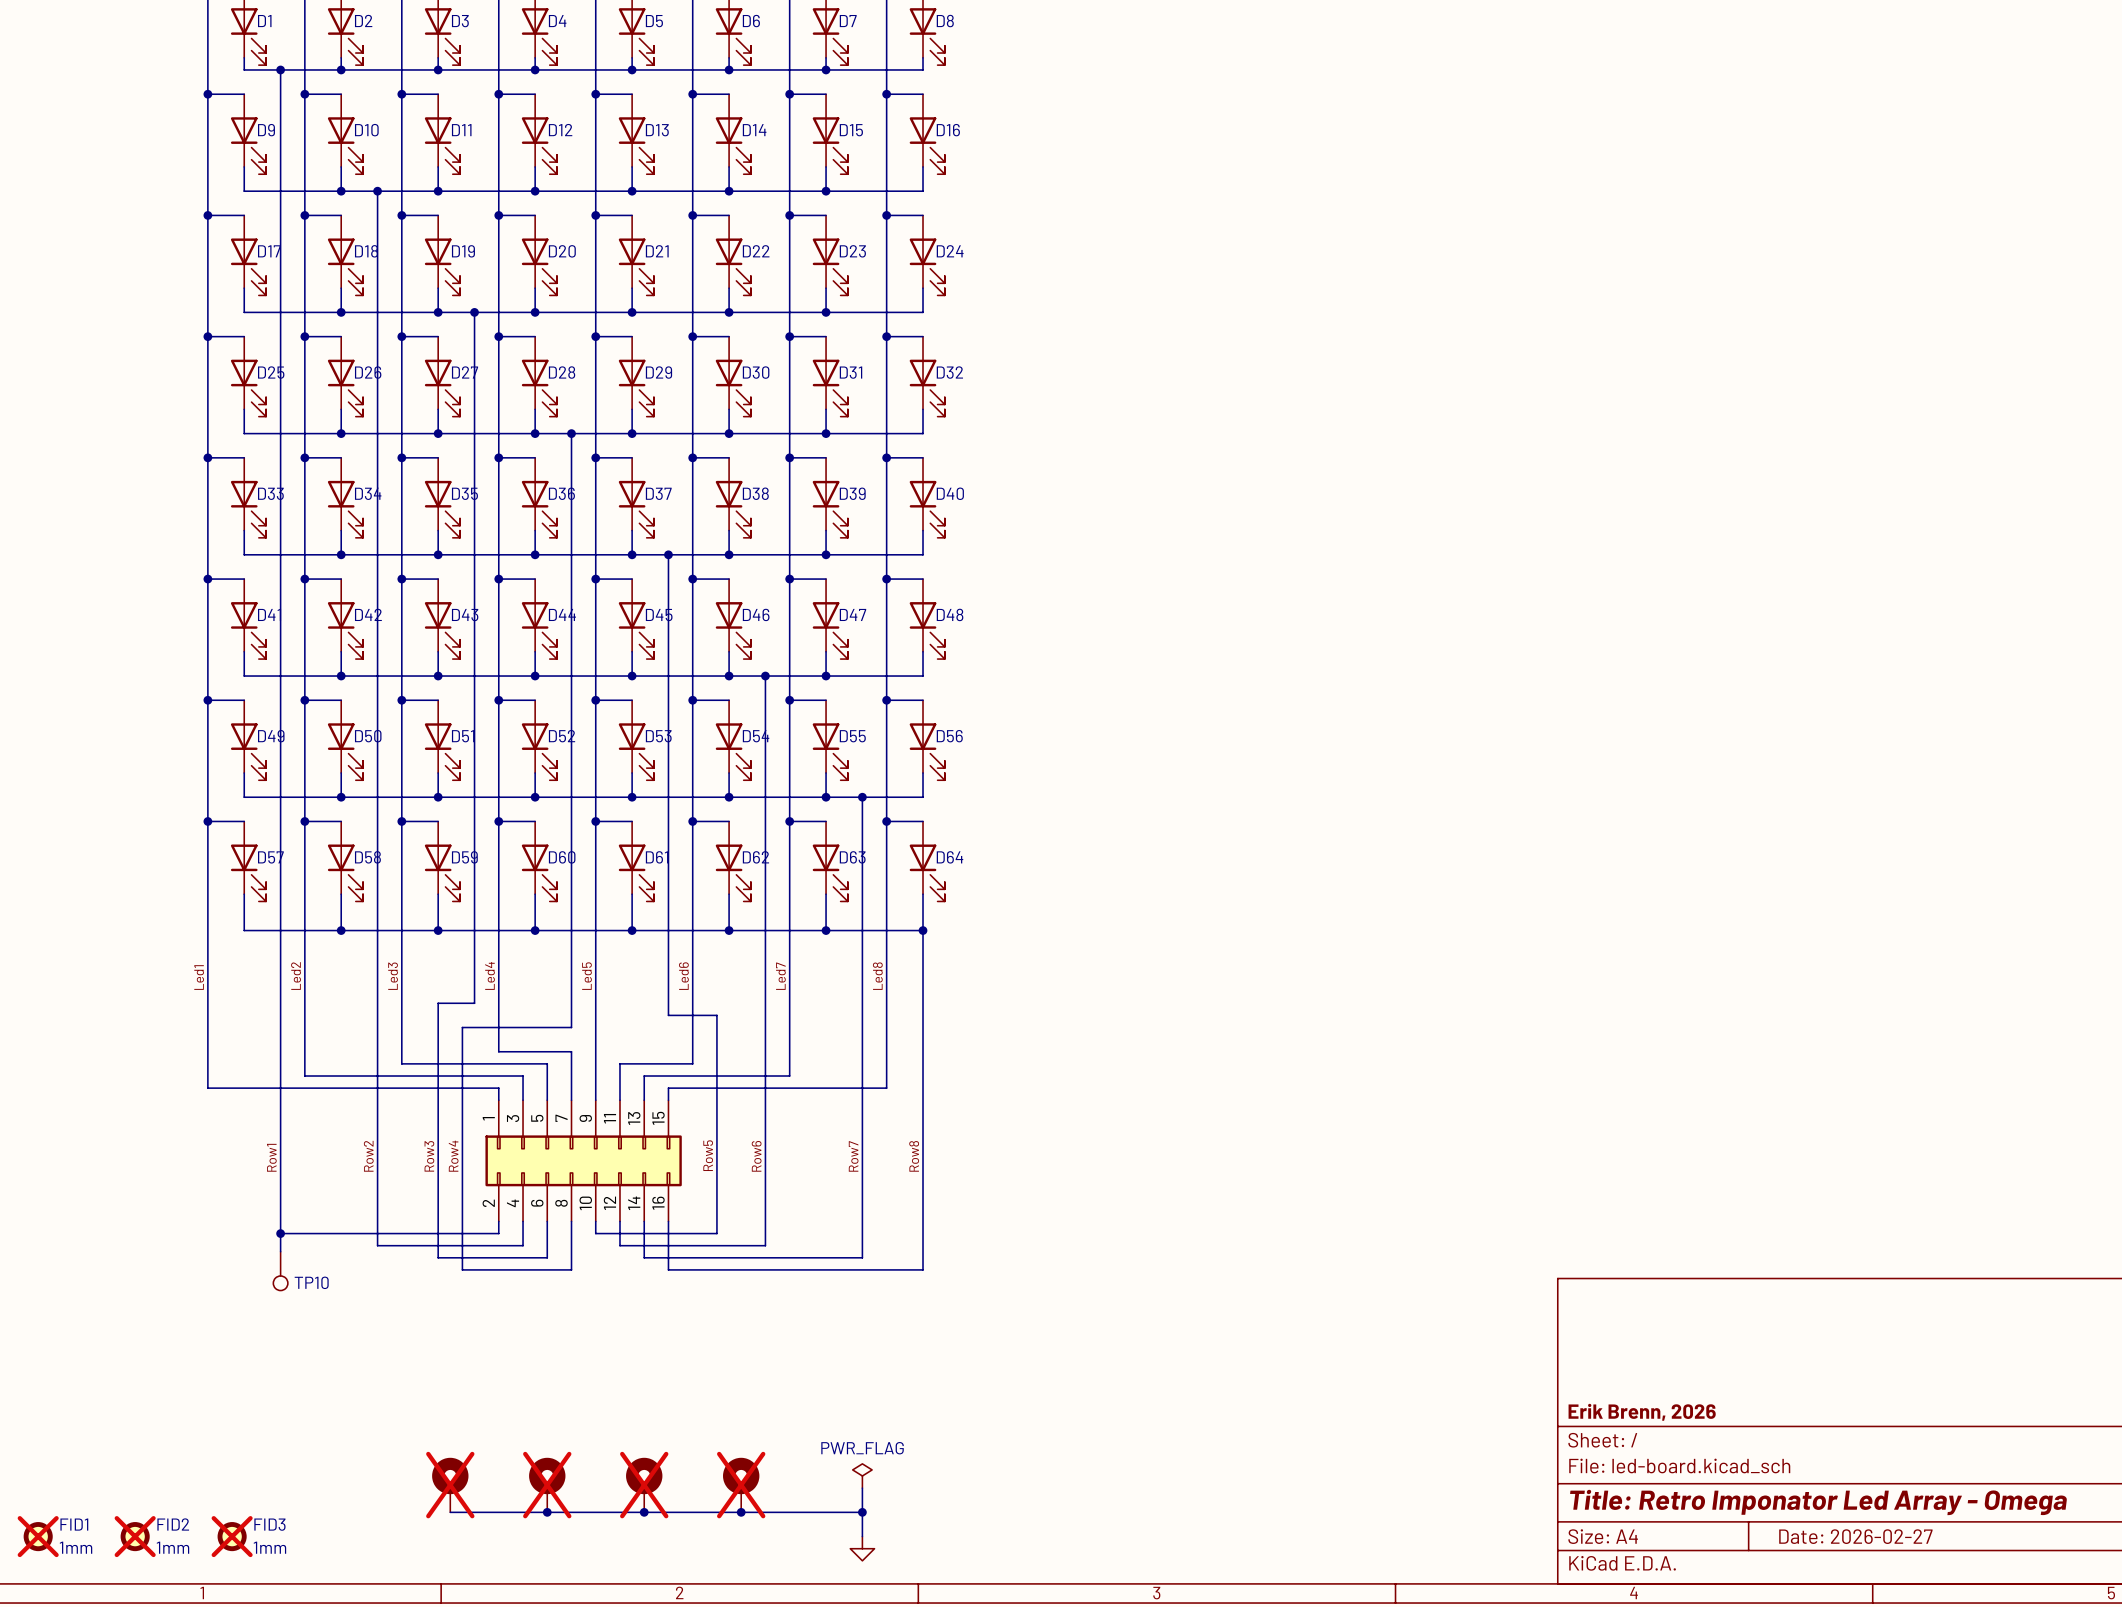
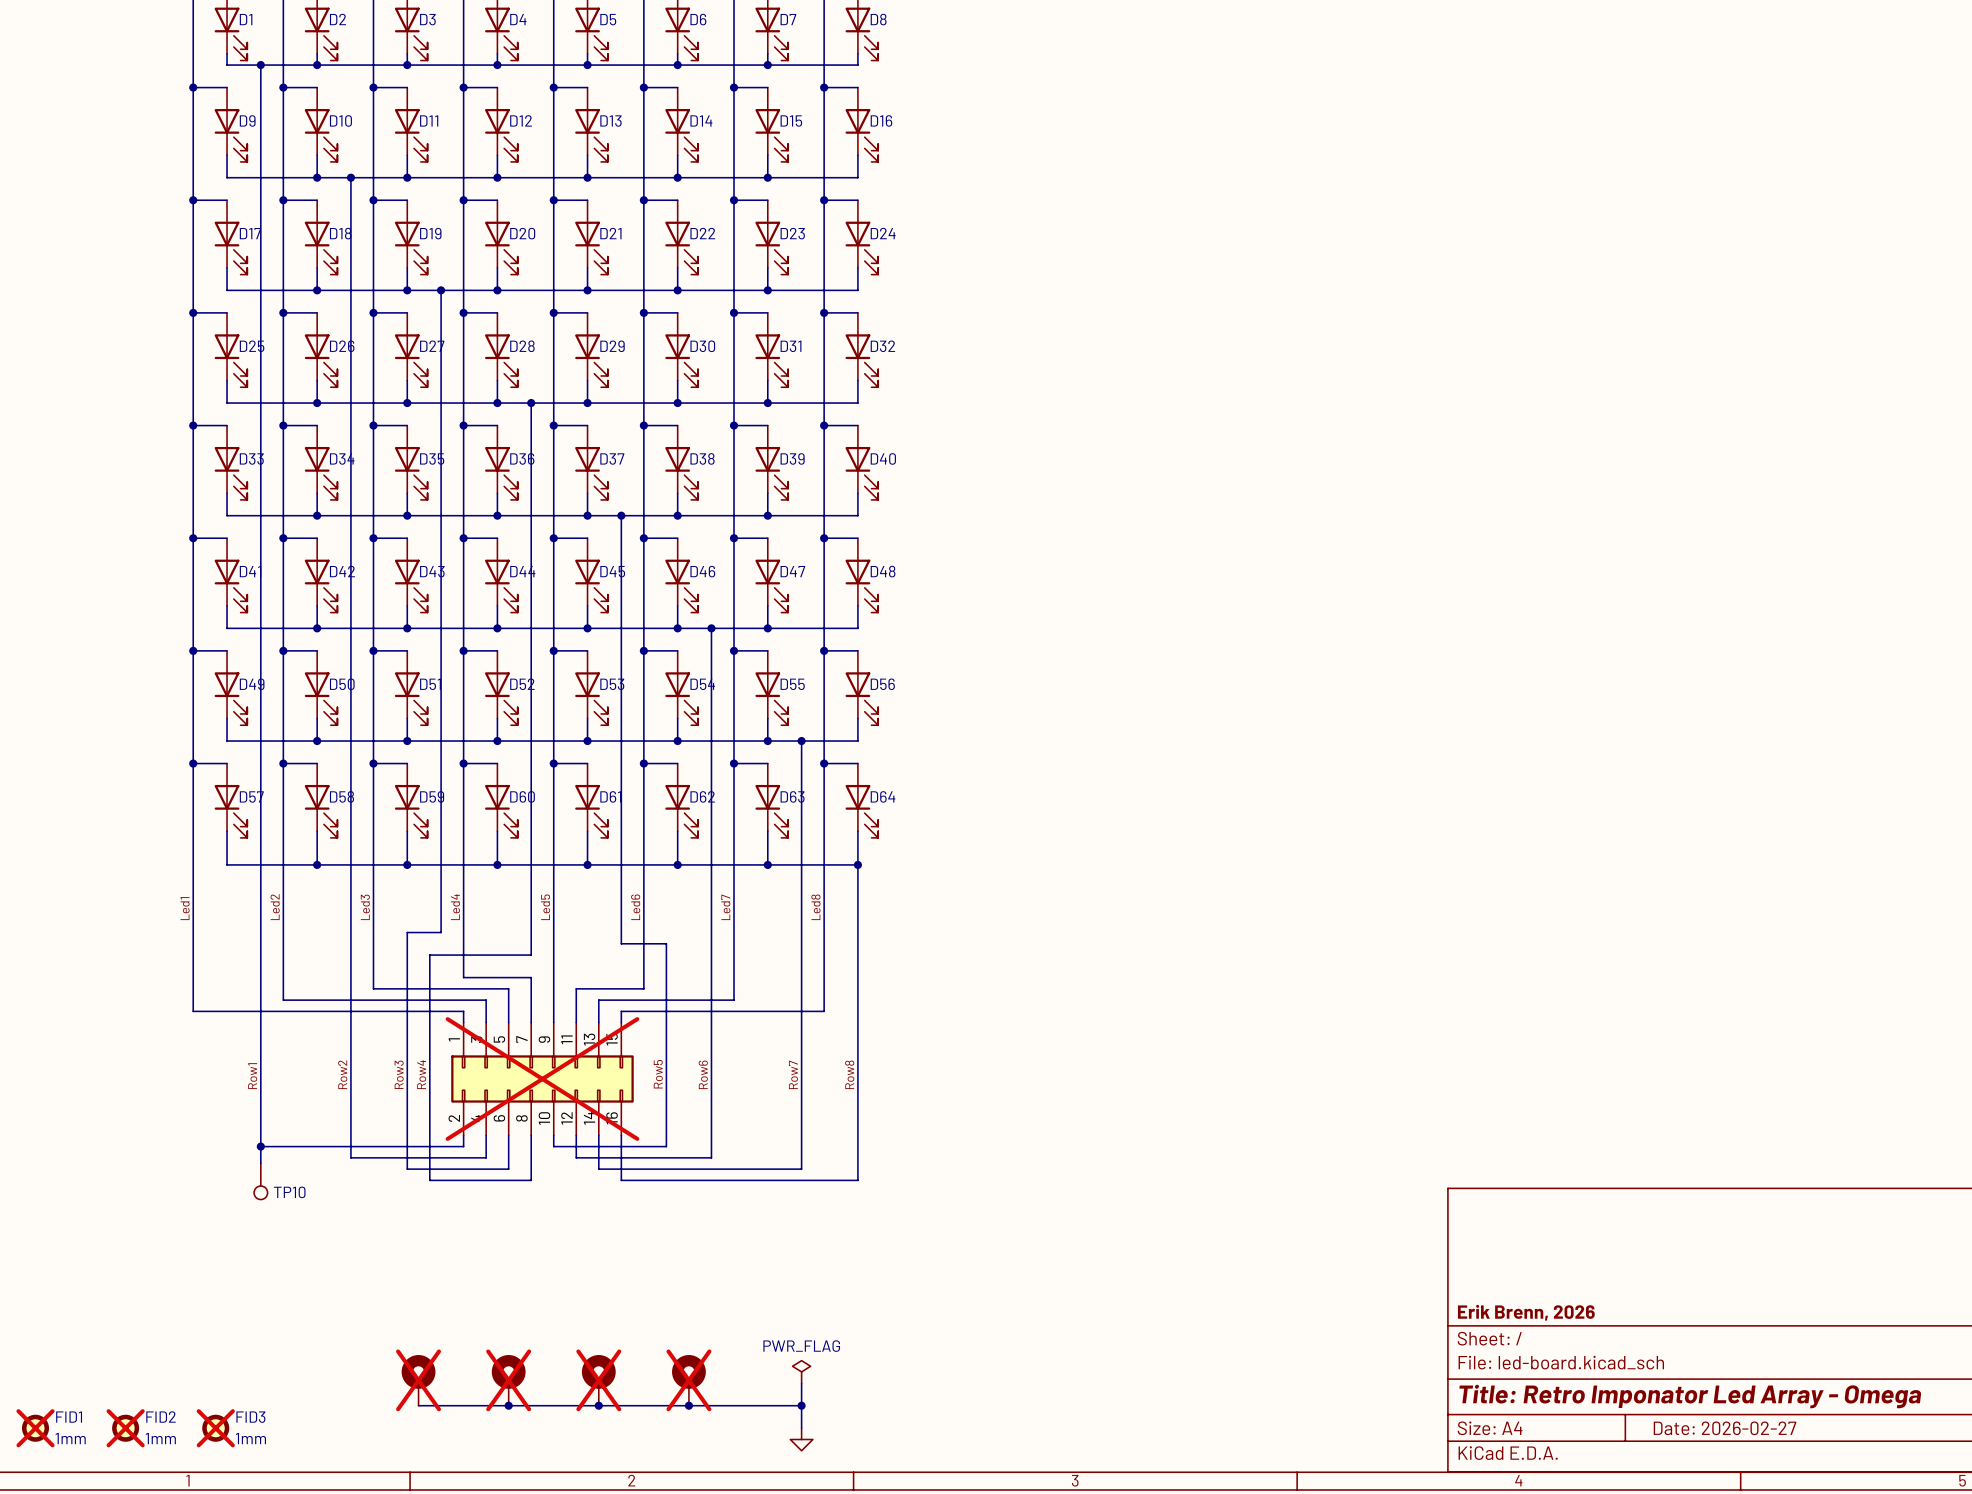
part do-not-place cross: none -> (542, 1078)

